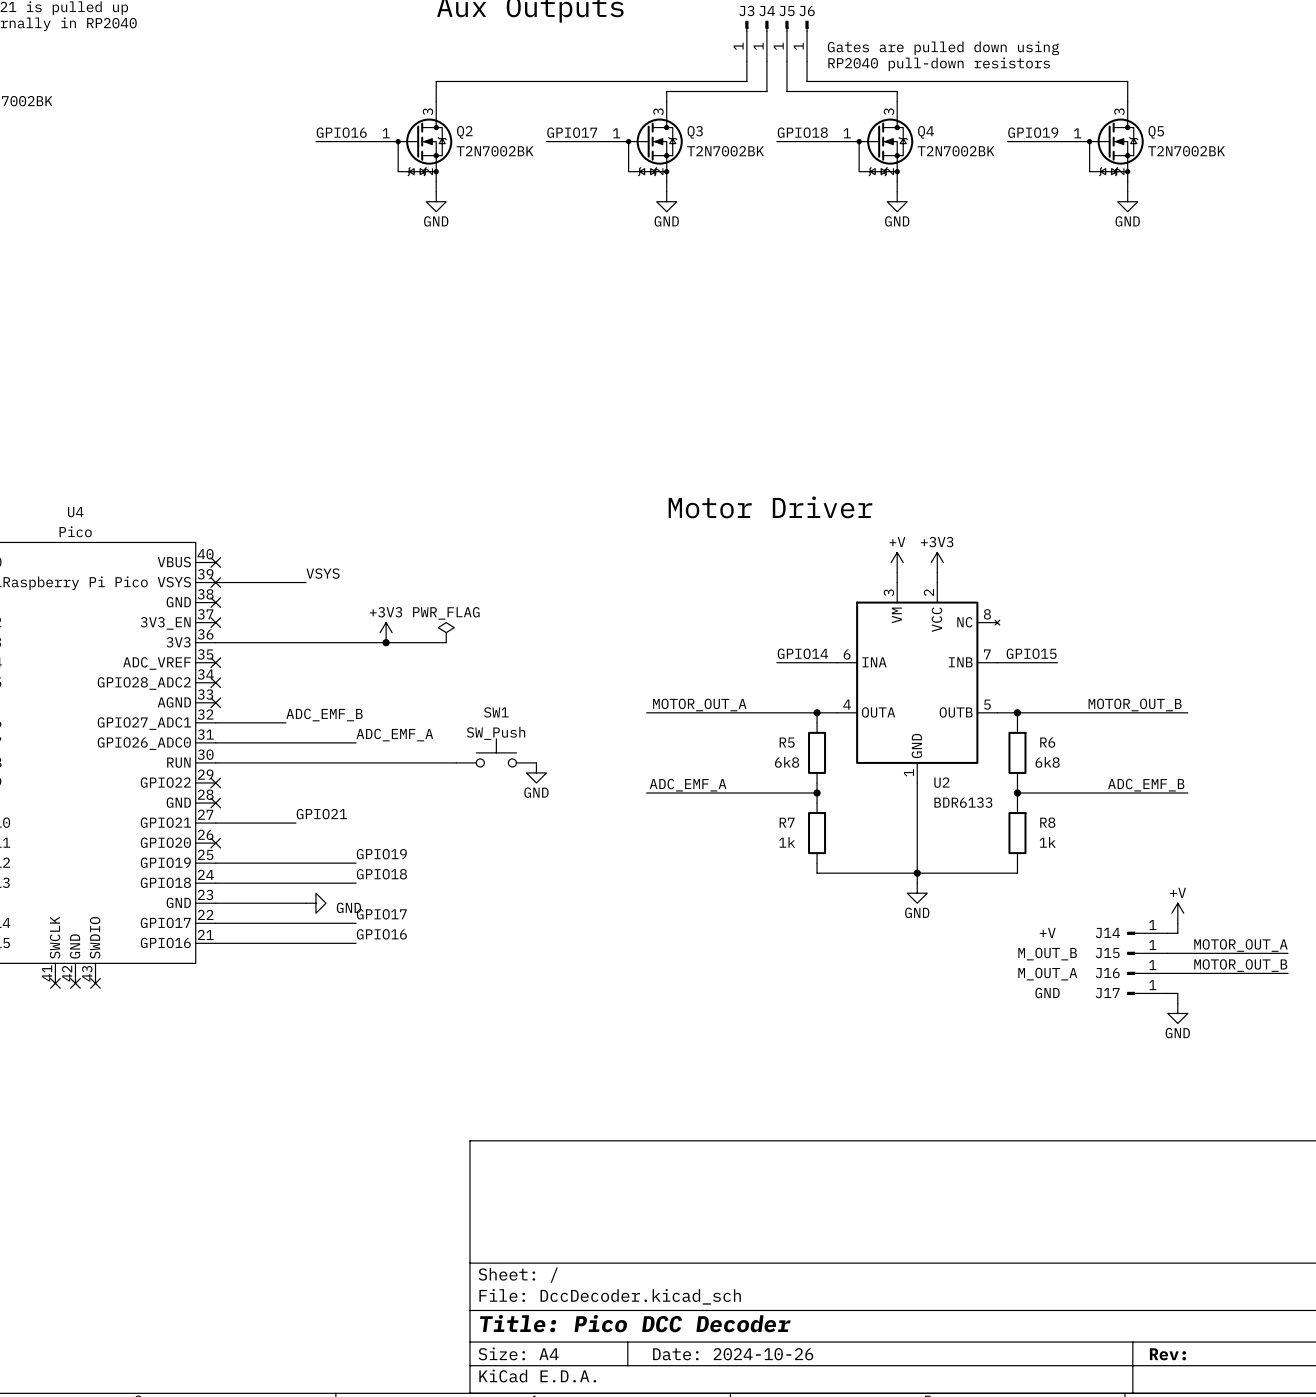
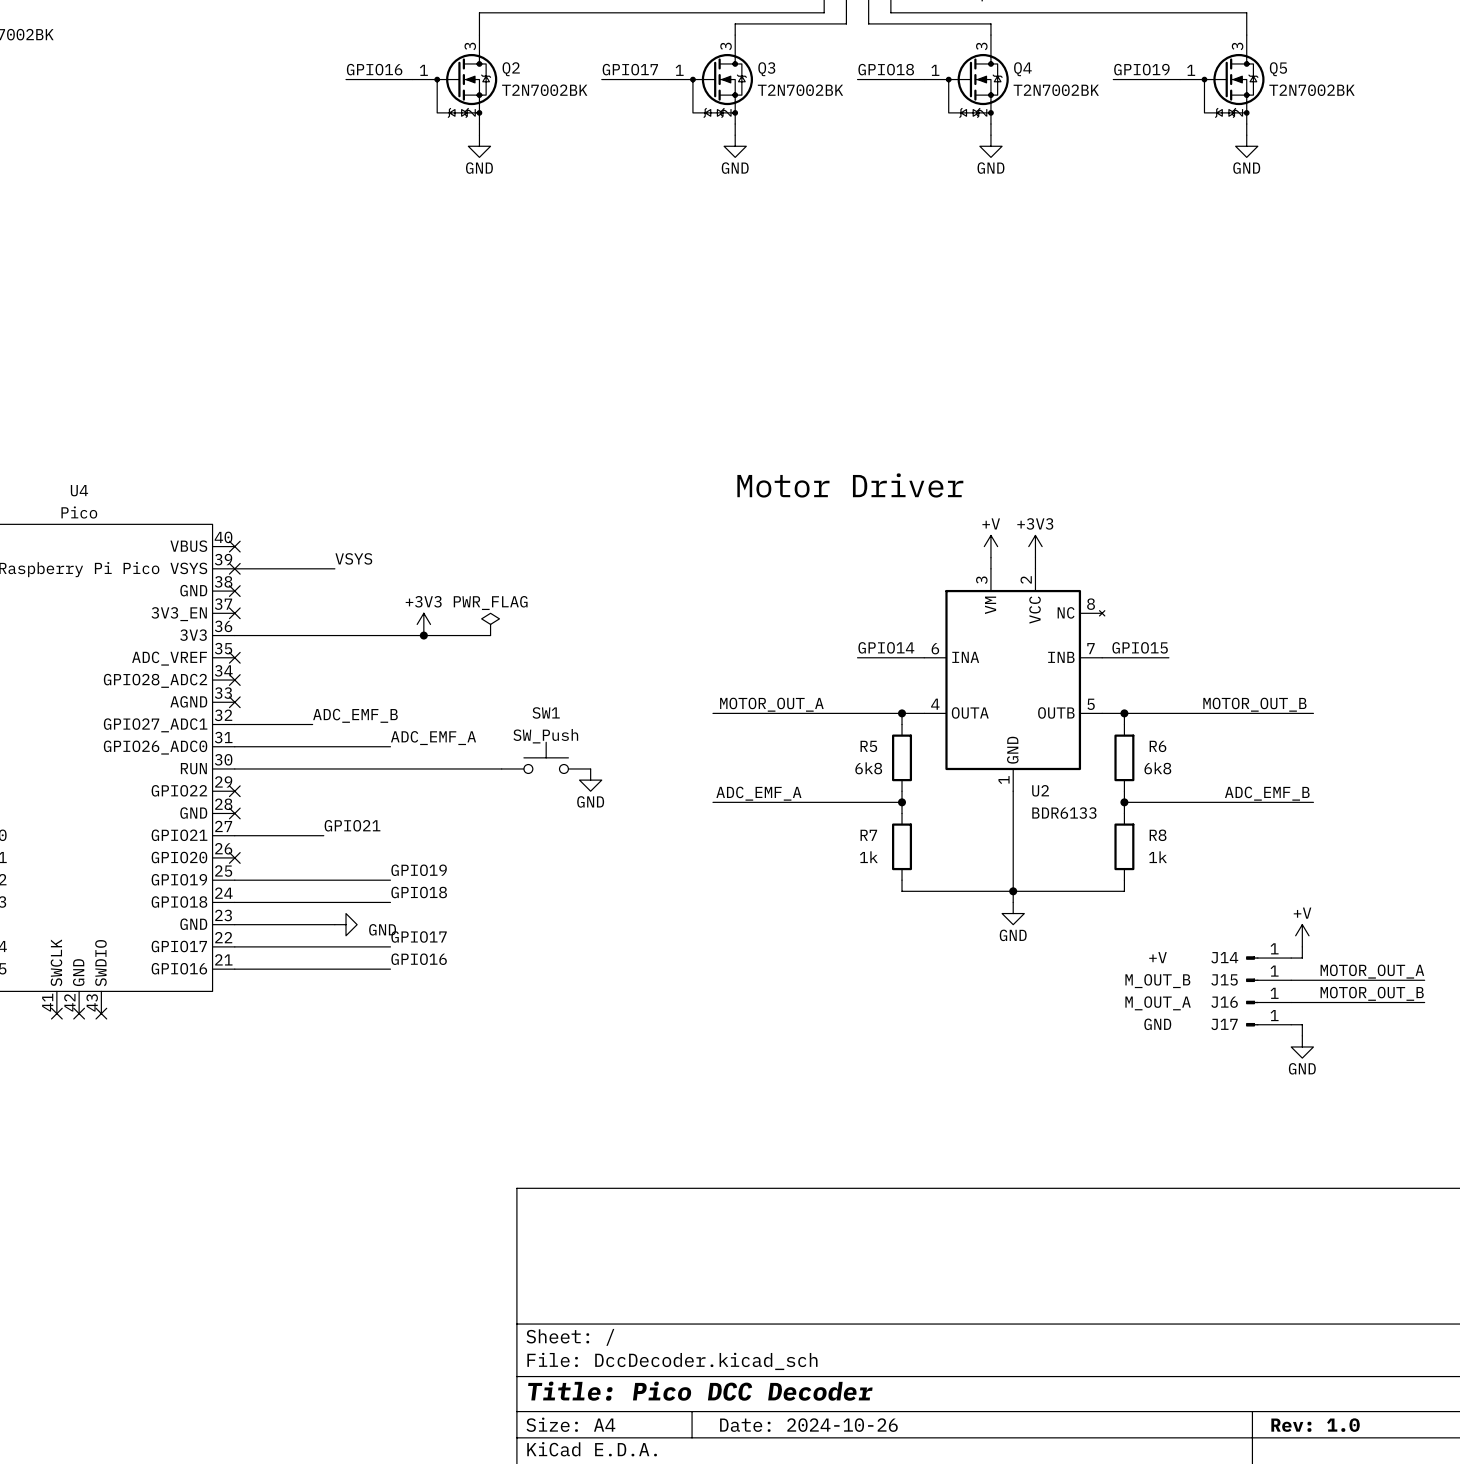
title block: Rev: (1167, 1354) -> Rev: 1.0 (1315, 1425)

